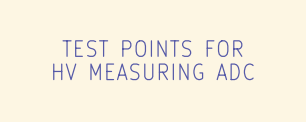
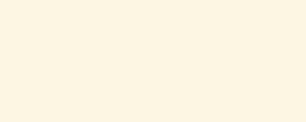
text: TEST POINTS FOR (152, 48) -> none
text: HV MEASURING ADC (153, 71) -> none

